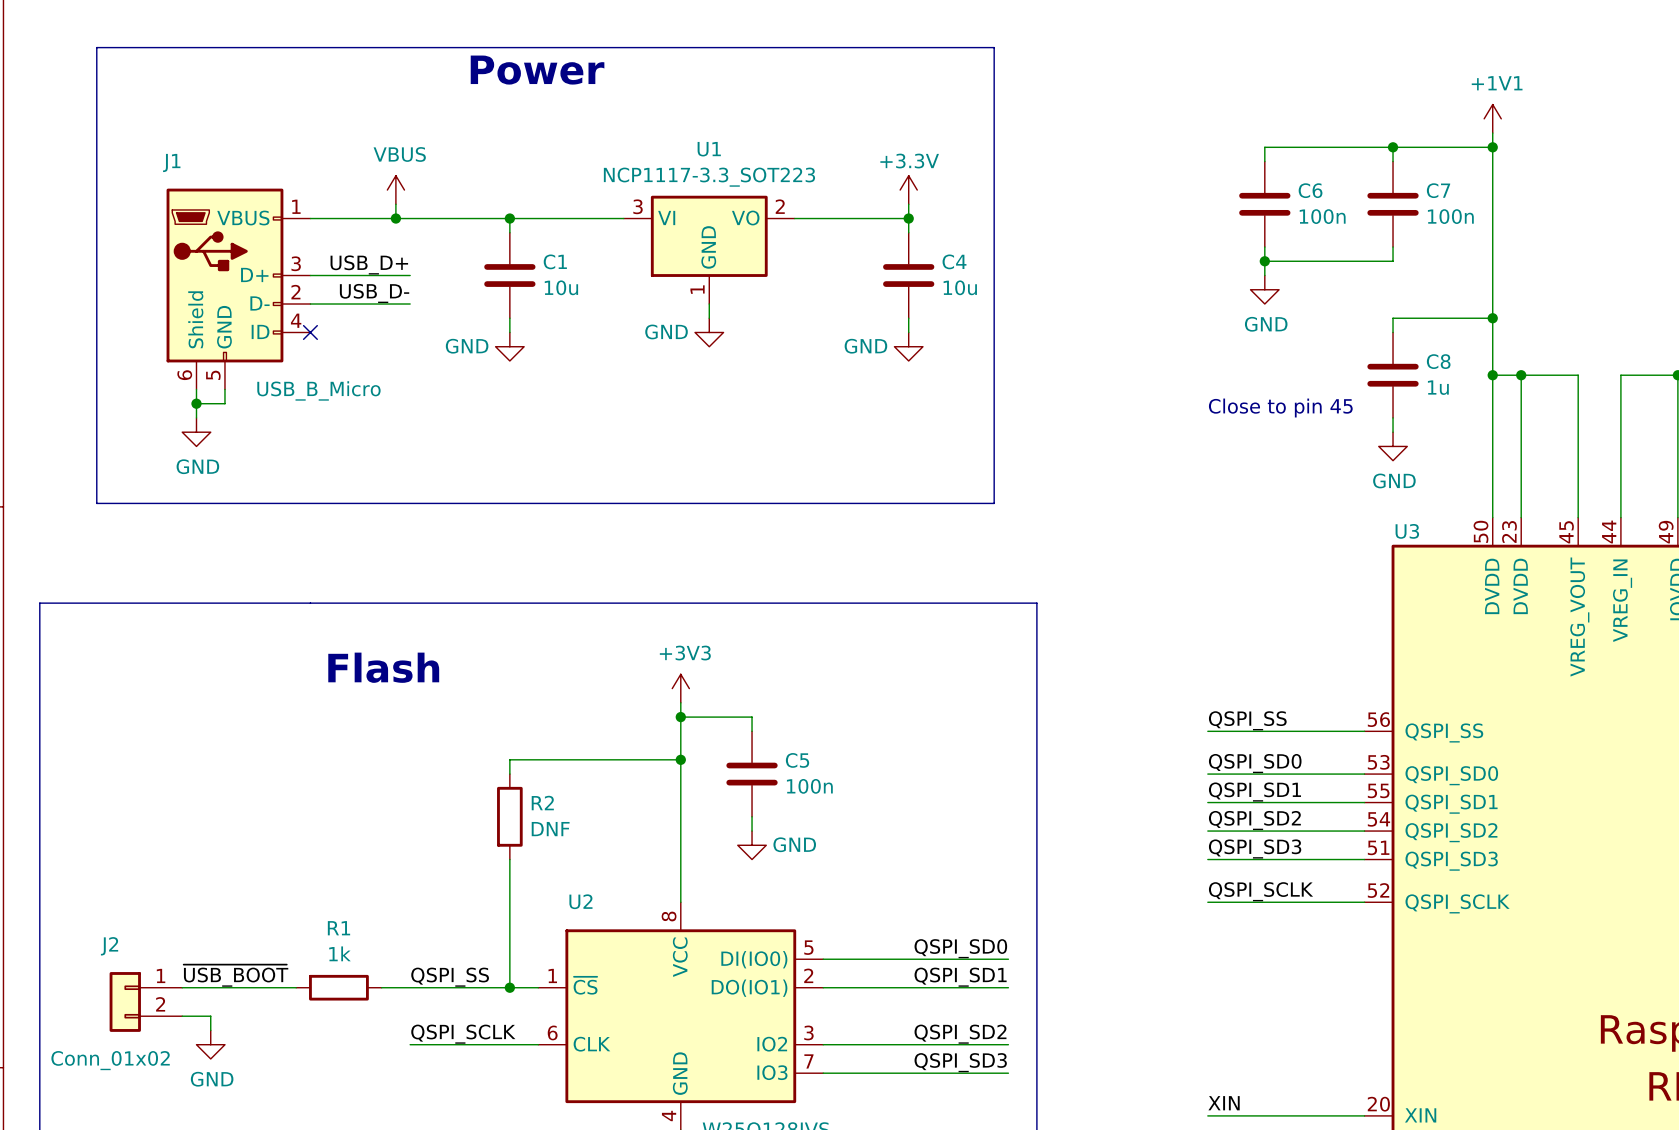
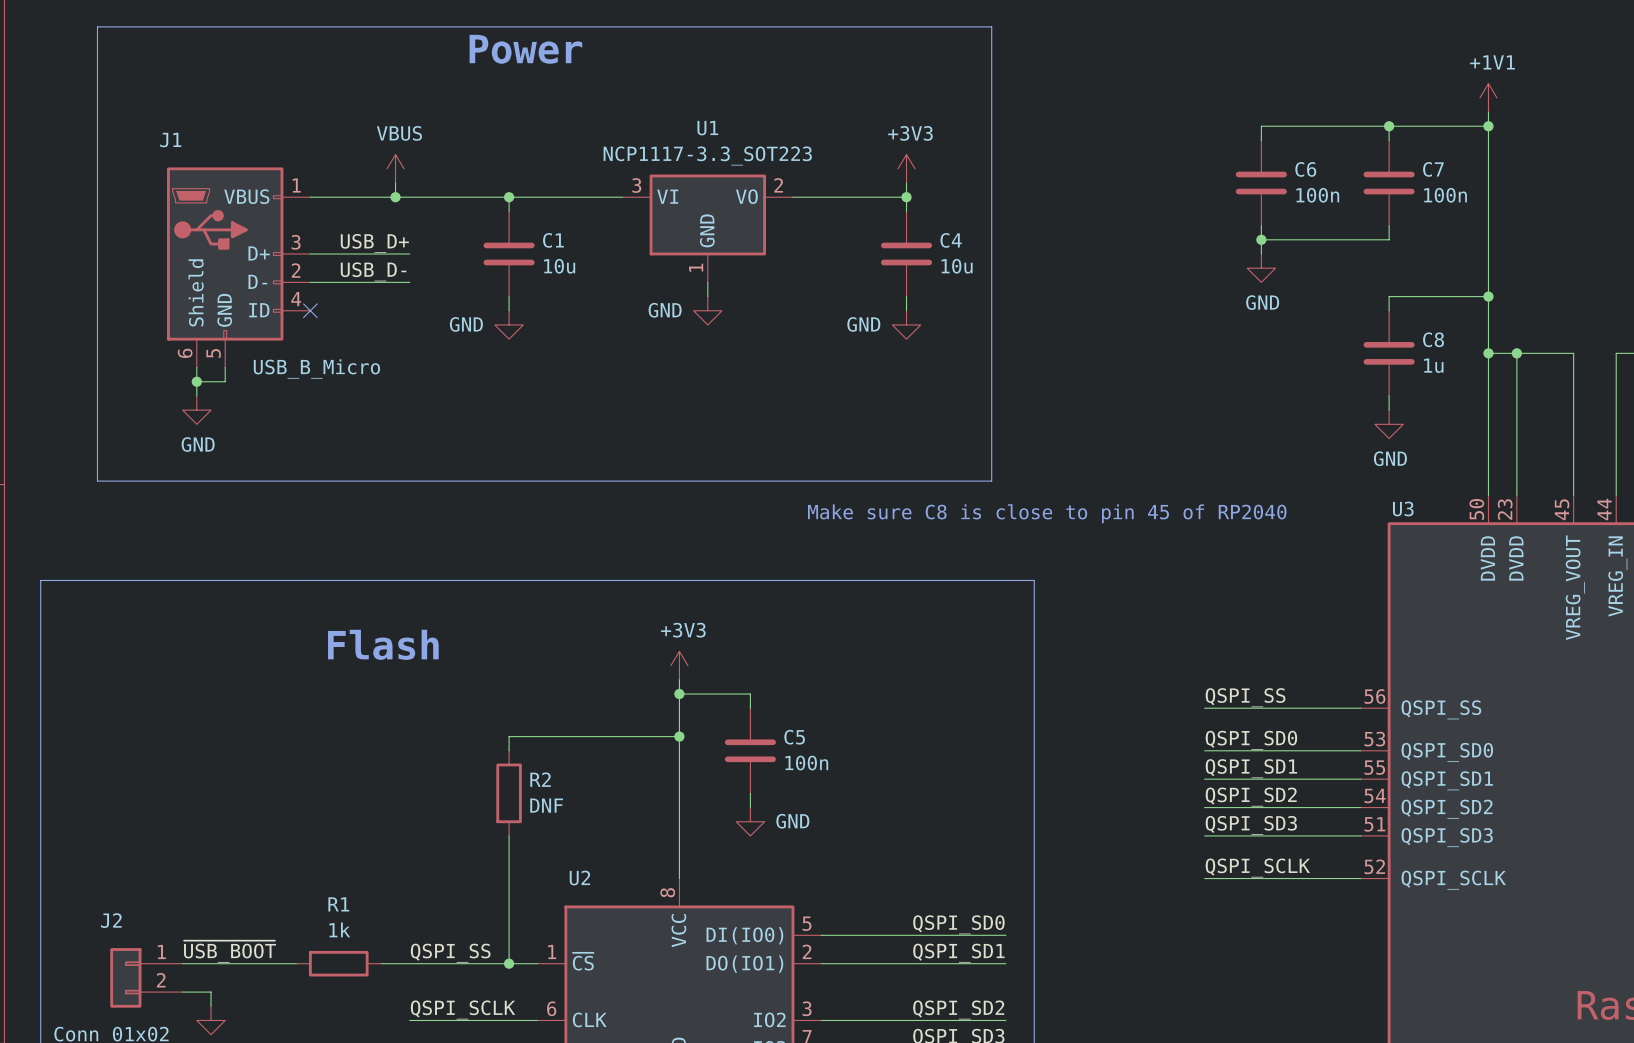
power symbol: +3.3V (908, 190) -> +3V3 (906, 168)
text: Close to pin 45 (1280, 408) -> none
text: none -> Make sure C8 is close to pin 45 of RP2040 (1047, 513)

